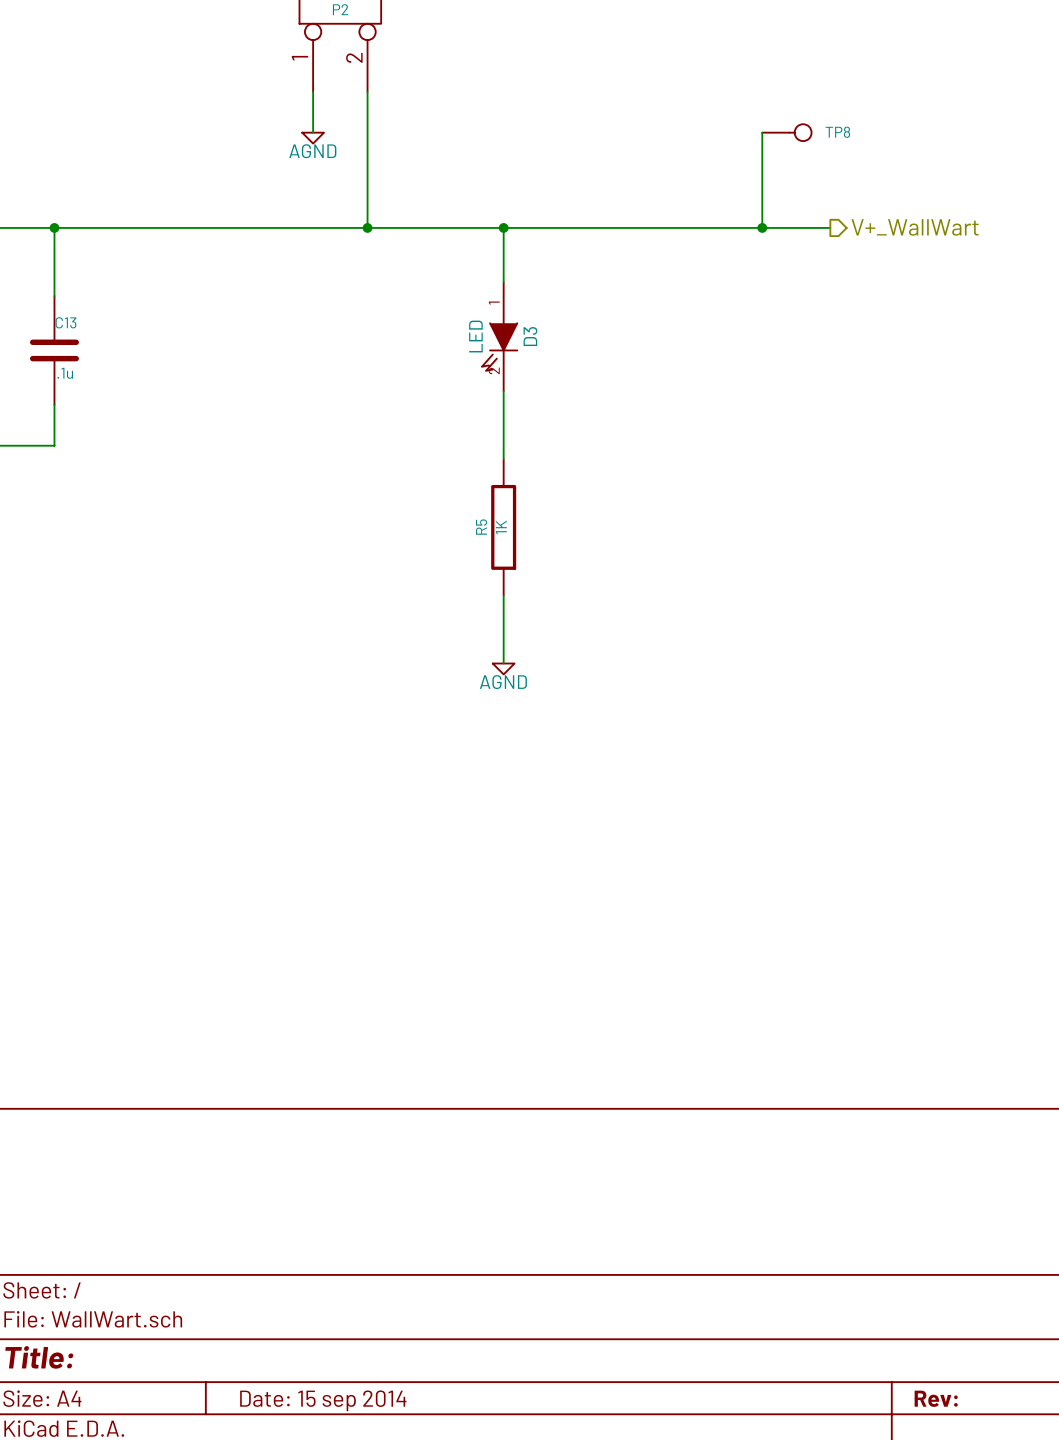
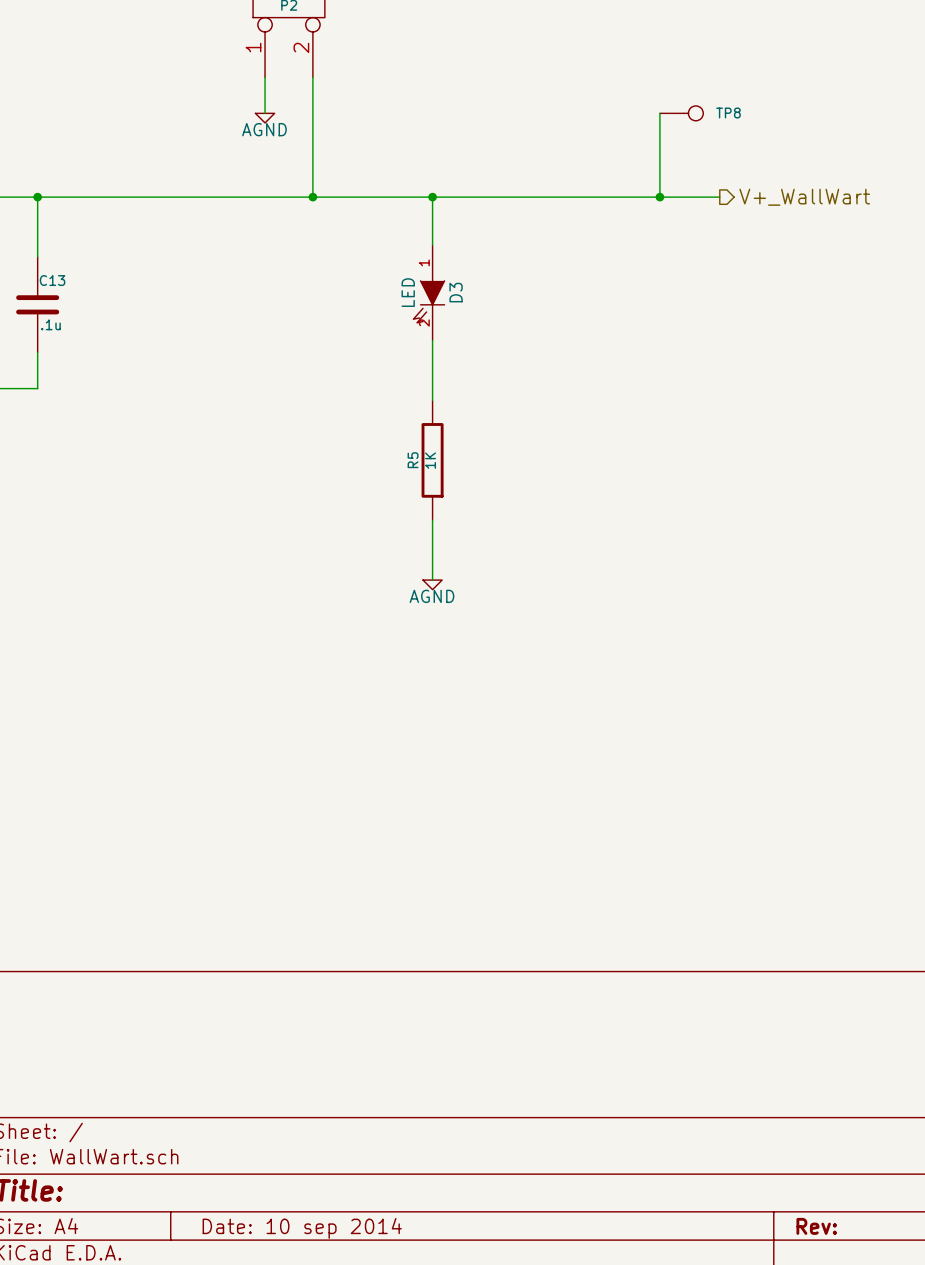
title block: Date: 15 sep 2014 (323, 1400) -> Date: 10 sep 2014 (302, 1228)

